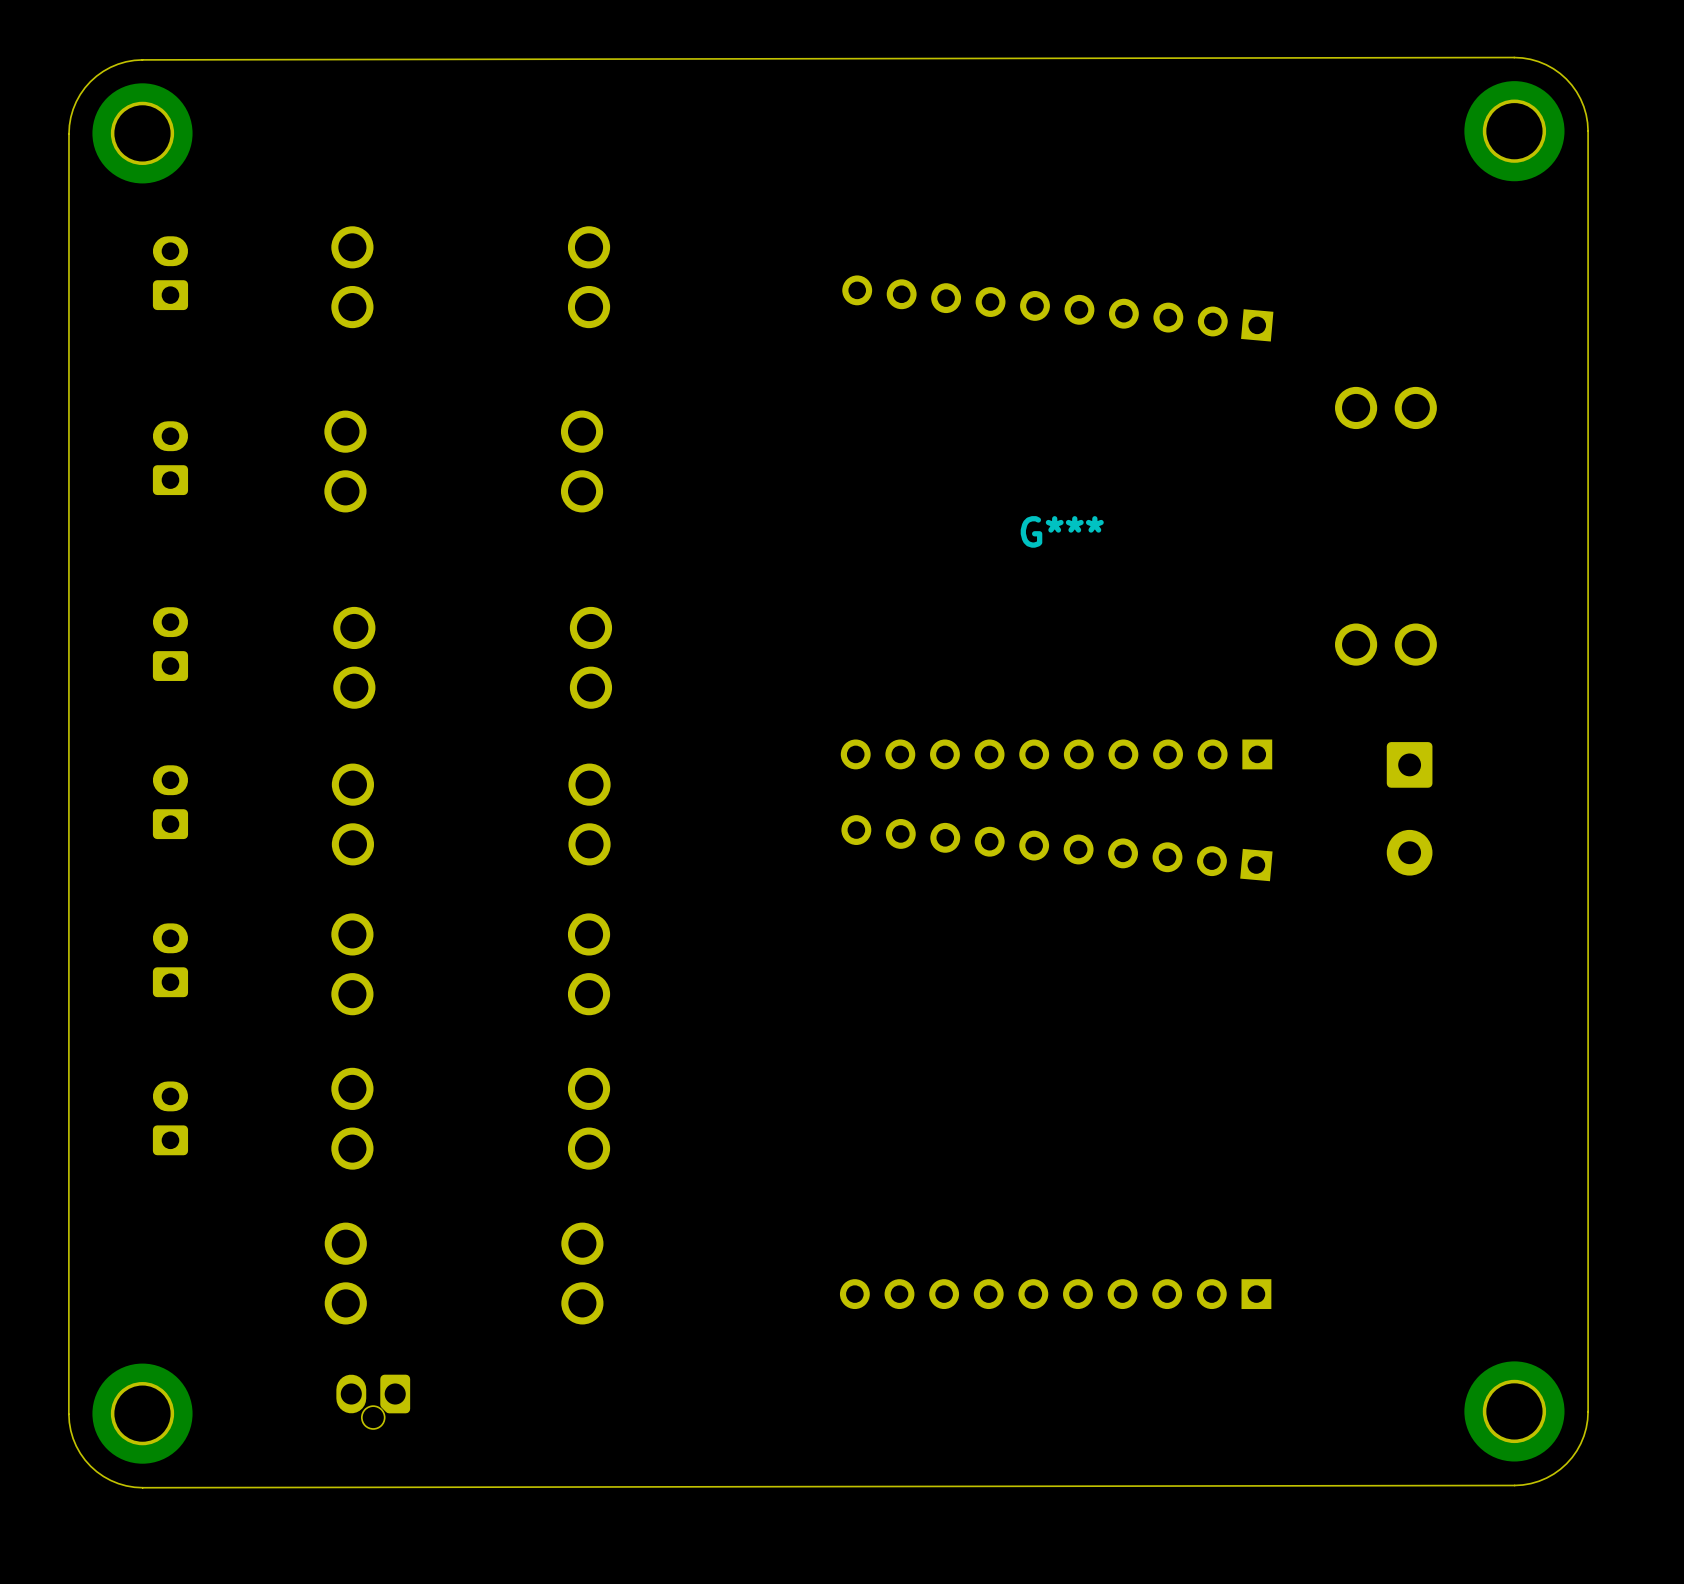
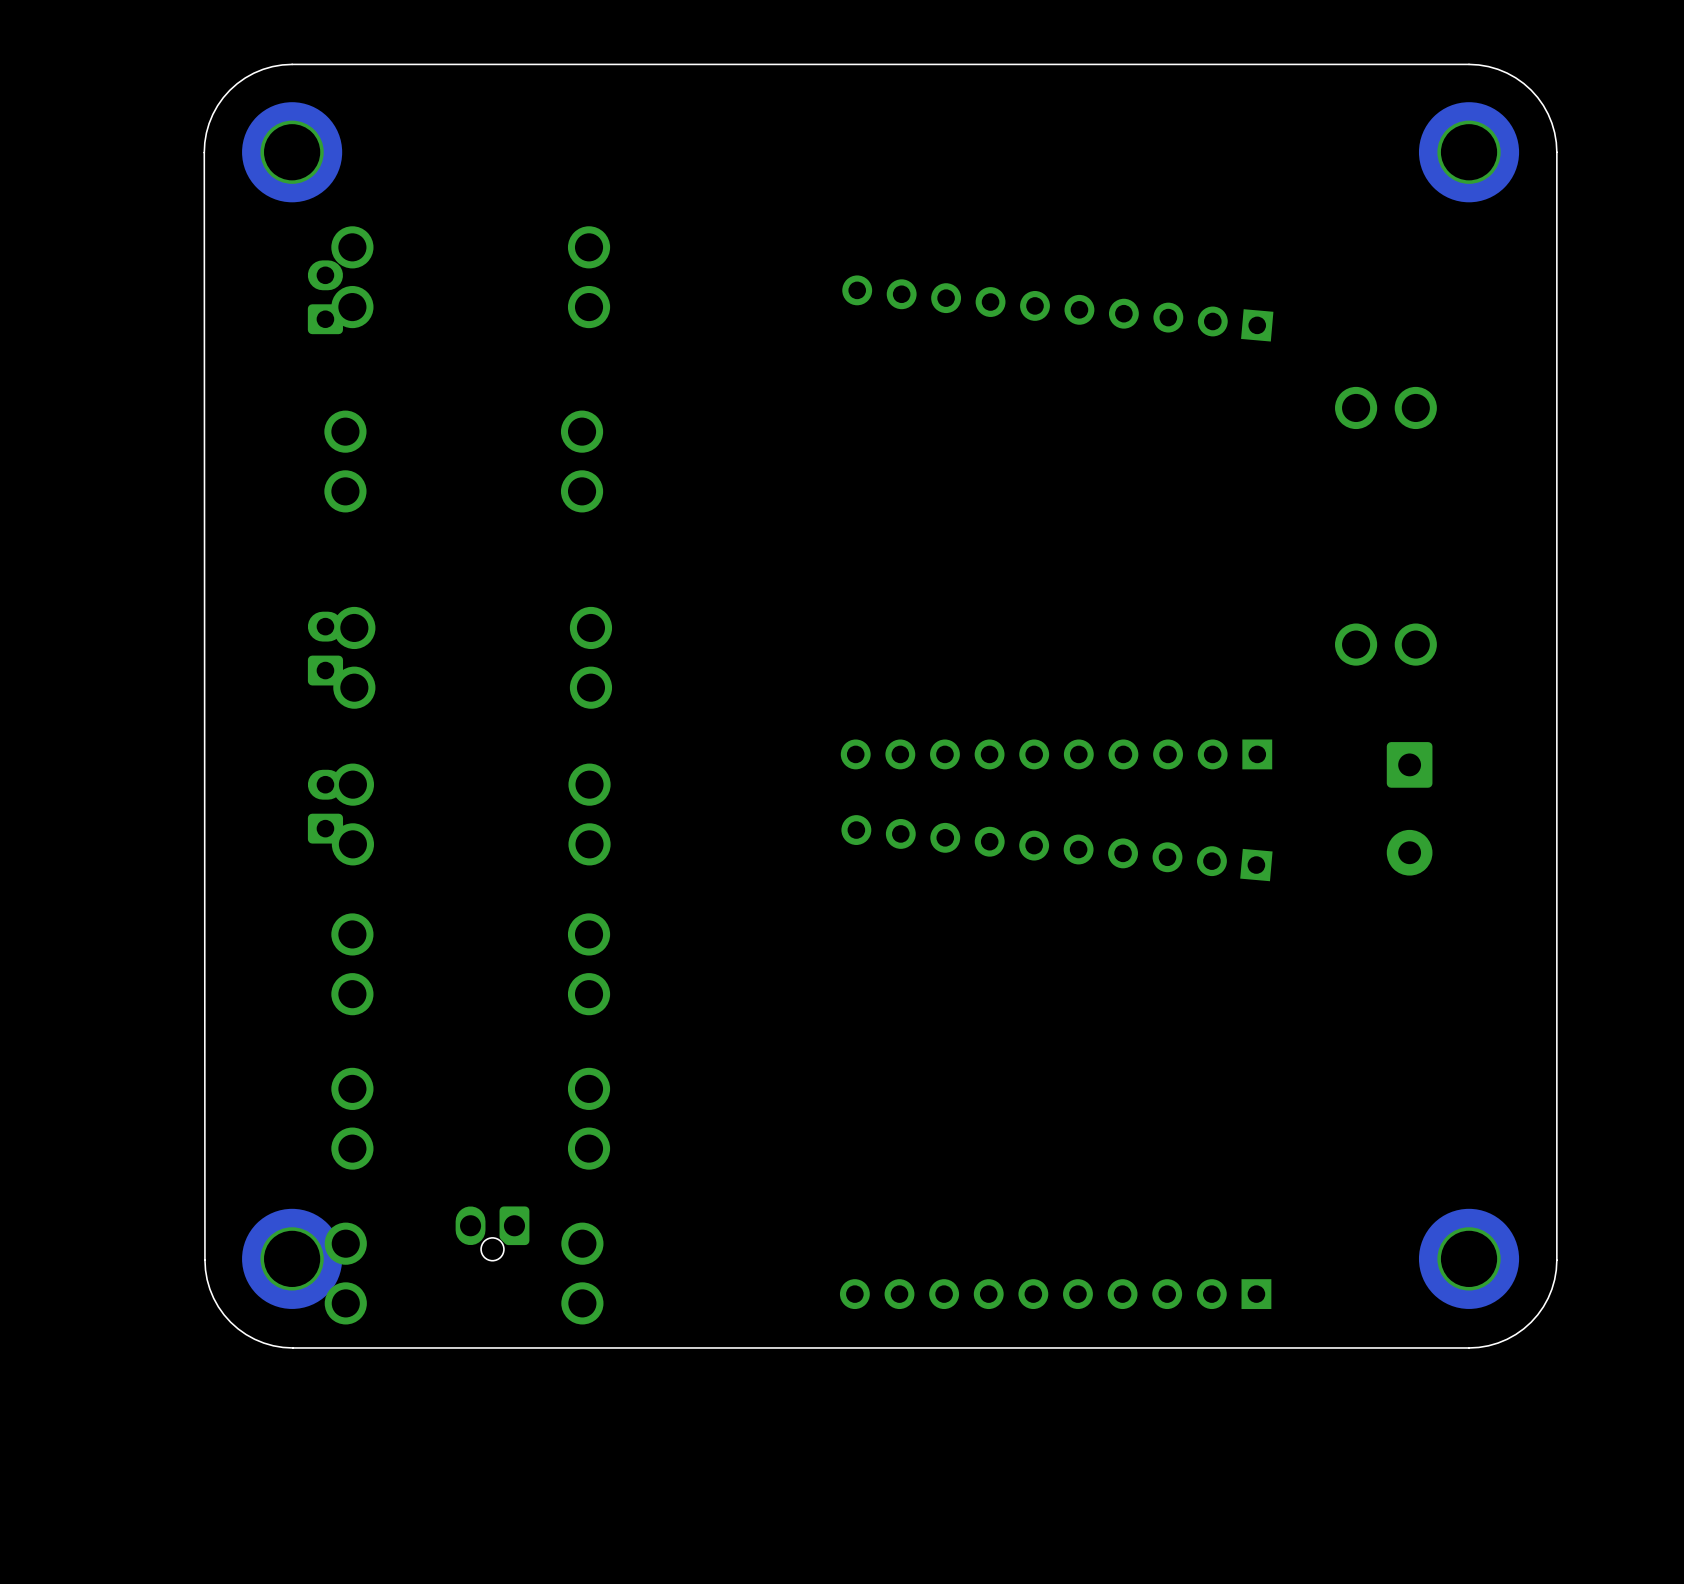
board edge: (1514, 57) (142, 59) (118, 64) (103, 71) (90, 81) (76, 101) (70, 117) (68, 133) (68, 1414) (73, 1438) (80, 1453) (90, 1466) (103, 1476) (118, 1483) (142, 1487) (1514, 1485) (1538, 1481) (1553, 1474) (1566, 1463) (1576, 1450) (1583, 1435) (1588, 1411) (1588, 130) (1583, 106) (1576, 91) (1566, 79) (1553, 68) (1538, 61) (1514, 57) -> (1469, 64) (1488, 66) (1507, 73) (1531, 90) (1543, 105) (1551, 123) (1556, 152) (1556, 1260) (1551, 1289) (1543, 1306) (1531, 1322) (1515, 1334) (1498, 1343) (1469, 1347) (292, 1347) (263, 1343) (246, 1334) (230, 1322) (218, 1306) (209, 1289) (204, 1260) (204, 152) (206, 132) (212, 114) (229, 90) (245, 77) (263, 69) (292, 64) (1469, 64)
part position: (1514, 131) -> (1469, 152)
part position: (142, 133) -> (292, 152)
part: (170, 273) -> none
part: none -> (325, 297)
part: (170, 458) -> none
G***: (1062, 531) -> none
part: (170, 644) -> none
part: none -> (325, 648)
part: (170, 802) -> none
part: none -> (325, 806)
part: (170, 960) -> none
part: (170, 1118) -> none
part position: (373, 1401) -> (492, 1233)
part position: (1514, 1411) -> (1469, 1258)
part position: (142, 1413) -> (292, 1258)

